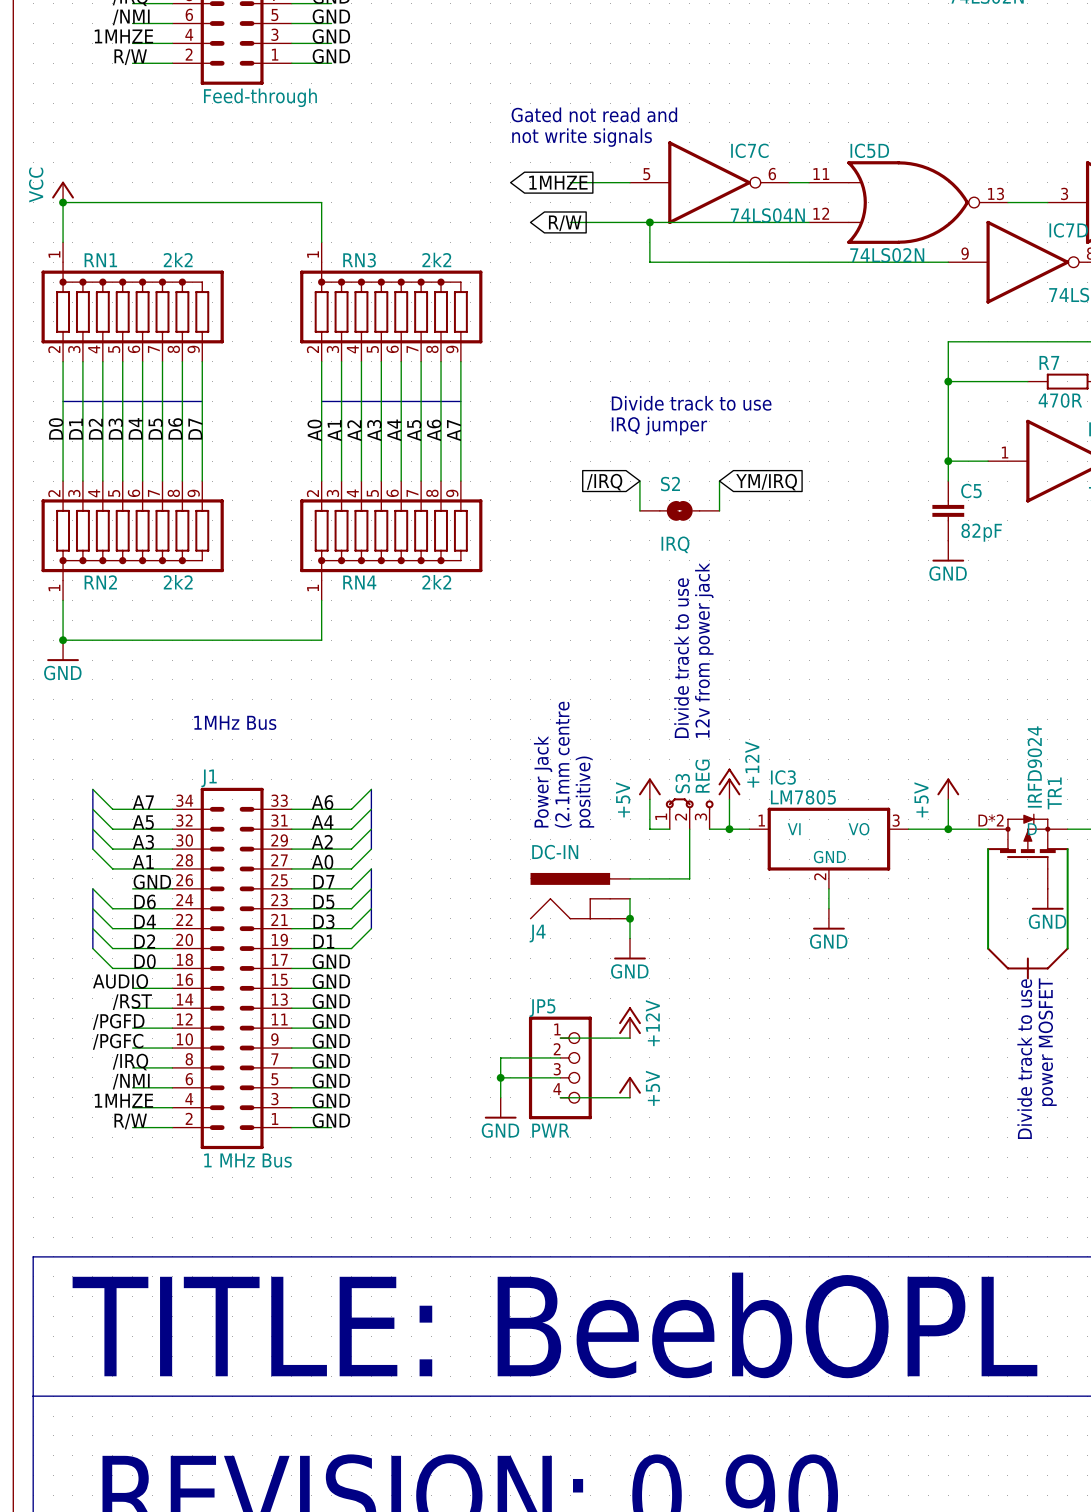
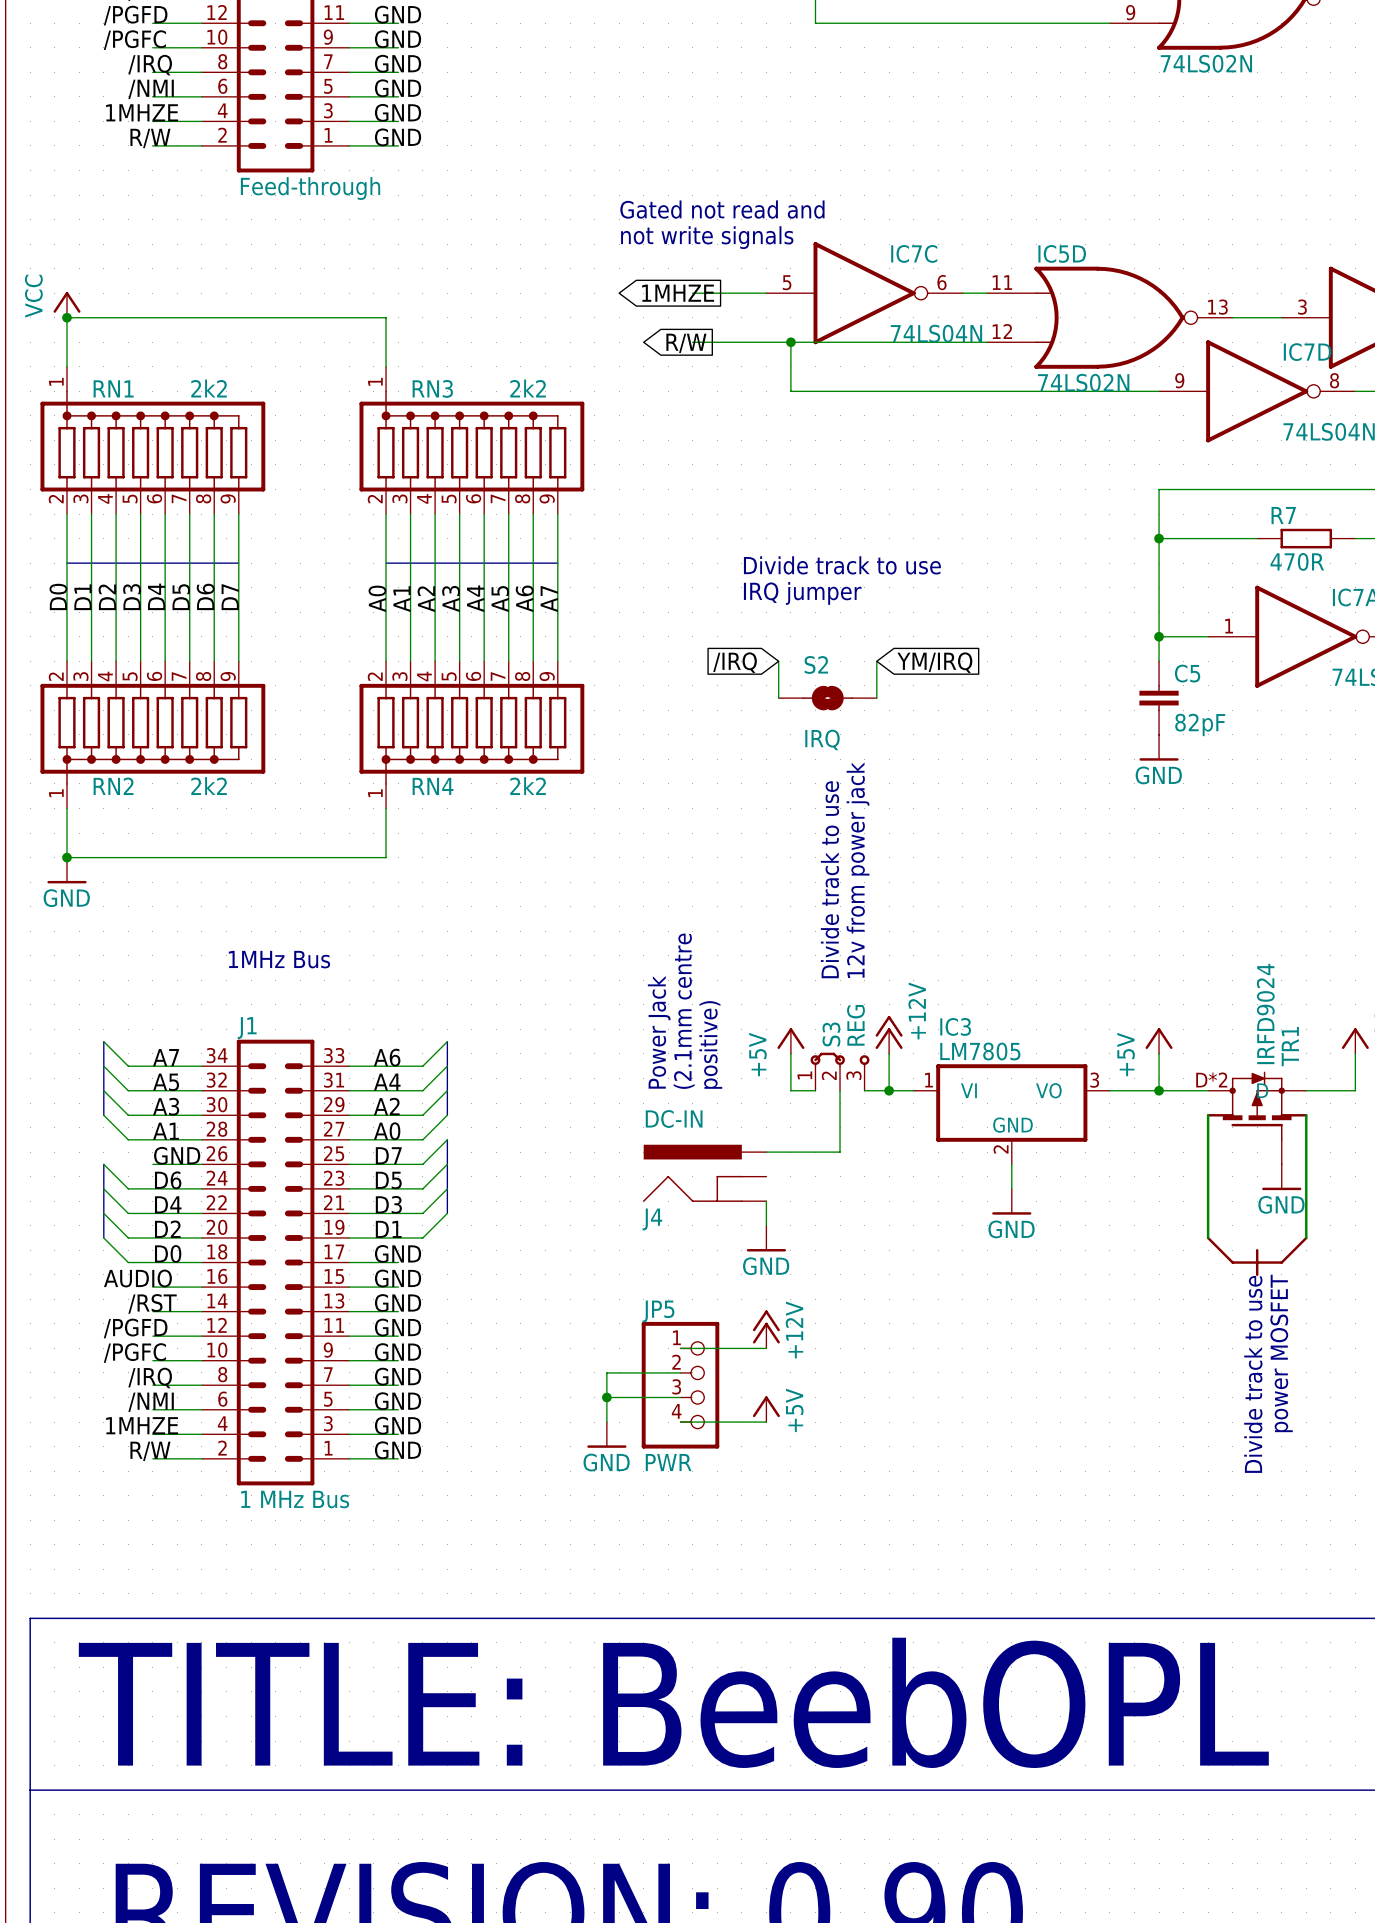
wire: (630, 898) (630, 918) -> none
junction: (630, 918) -> none

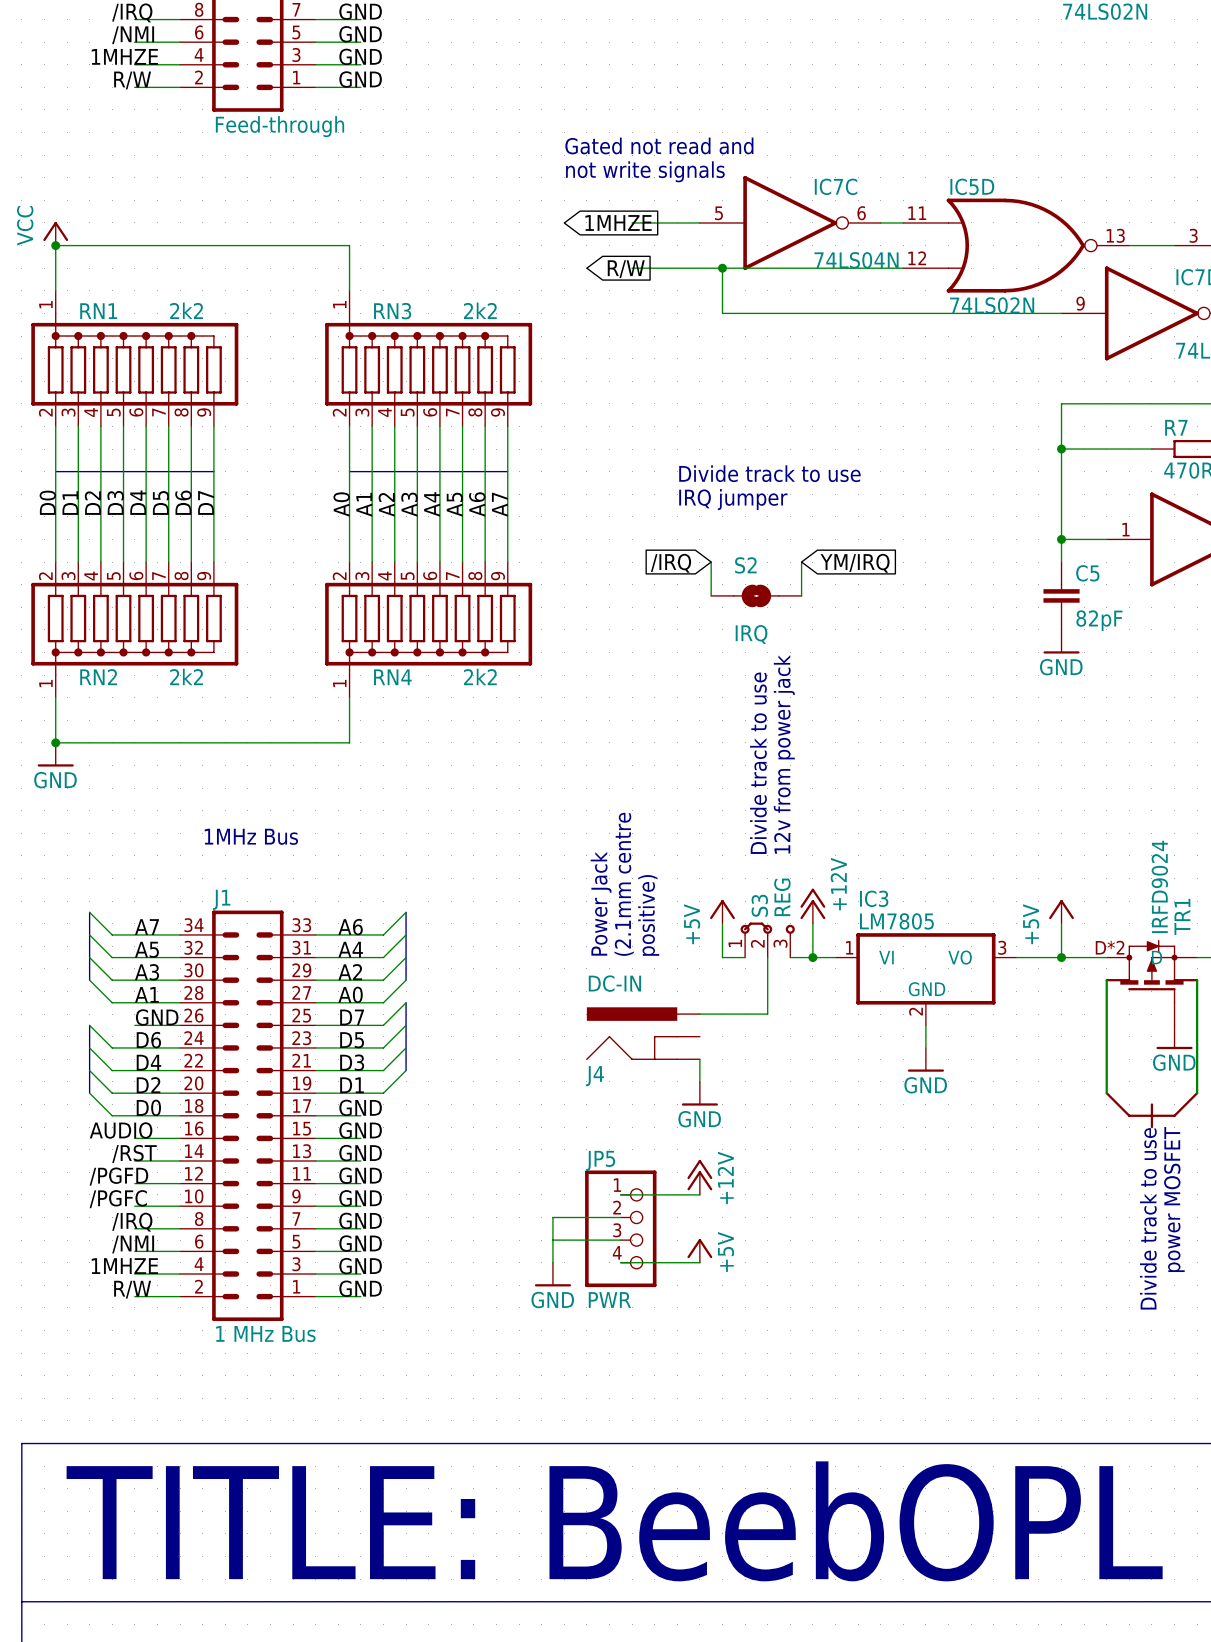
junction: (606, 1397) -> none

